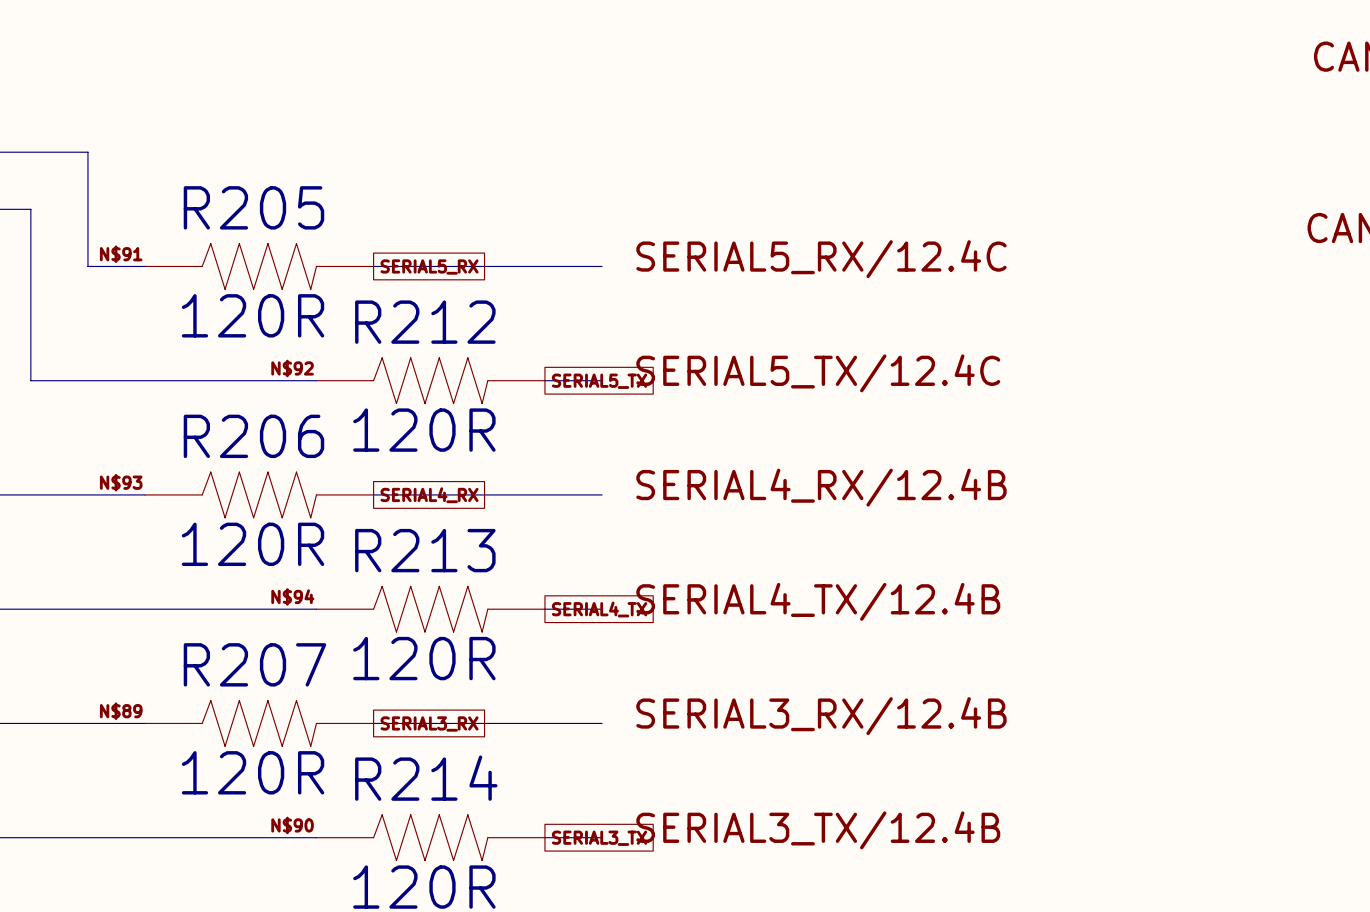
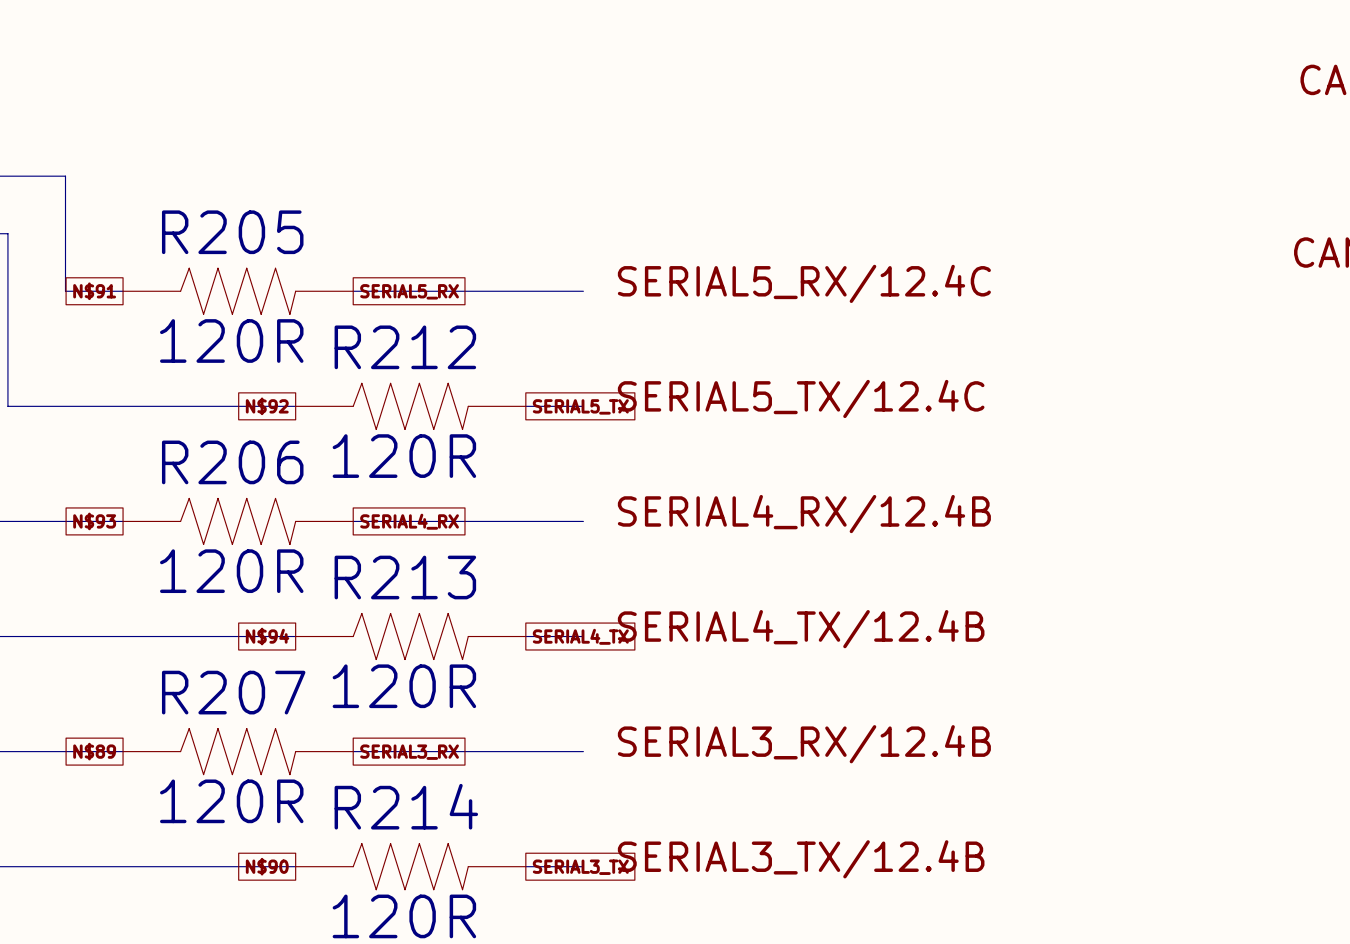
label: N$91 (121, 254) -> none
global label: none -> N$91 (94, 291)
label: N$92 (292, 368) -> none
global label: none -> N$92 (267, 406)
label: N$93 (121, 482) -> none
global label: none -> N$93 (94, 521)
label: N$94 (292, 596) -> none
global label: none -> N$94 (267, 636)
label: N$89 (121, 711) -> none
global label: none -> N$89 (94, 751)
label: N$90 (292, 825) -> none
global label: none -> N$90 (267, 866)

